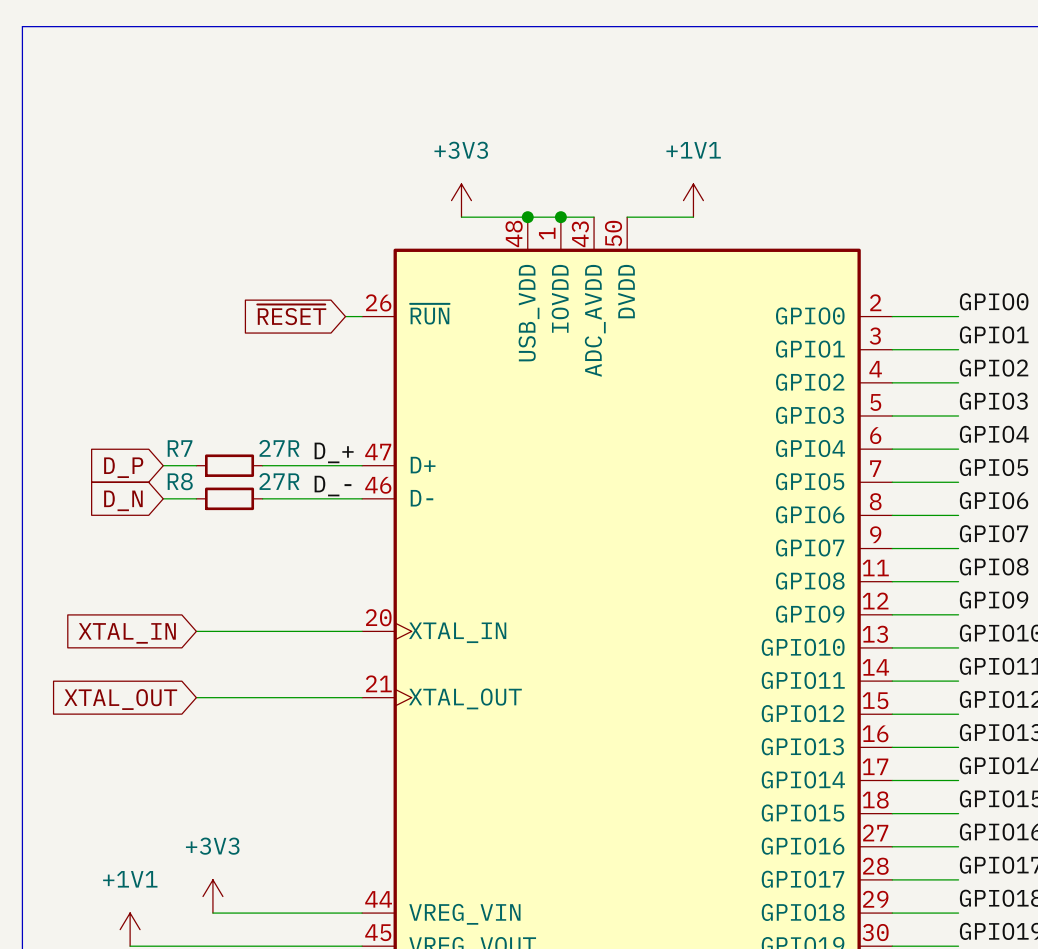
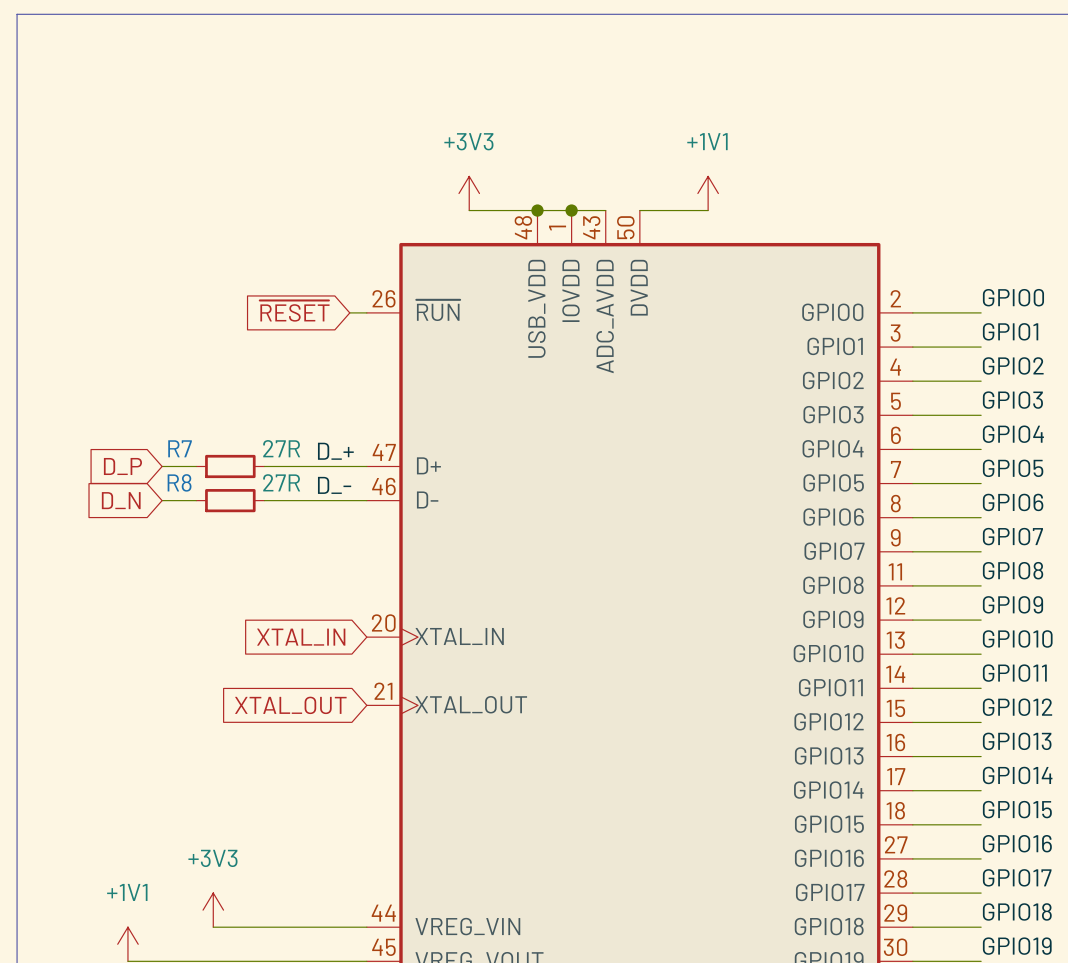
wire: (196, 631) (362, 631) -> none
global label position: XTAL_IN (127, 633) -> XTAL_IN (301, 637)
wire: (196, 697) (362, 697) -> none
global label position: XTAL_OUT (120, 699) -> XTAL_OUT (290, 705)

